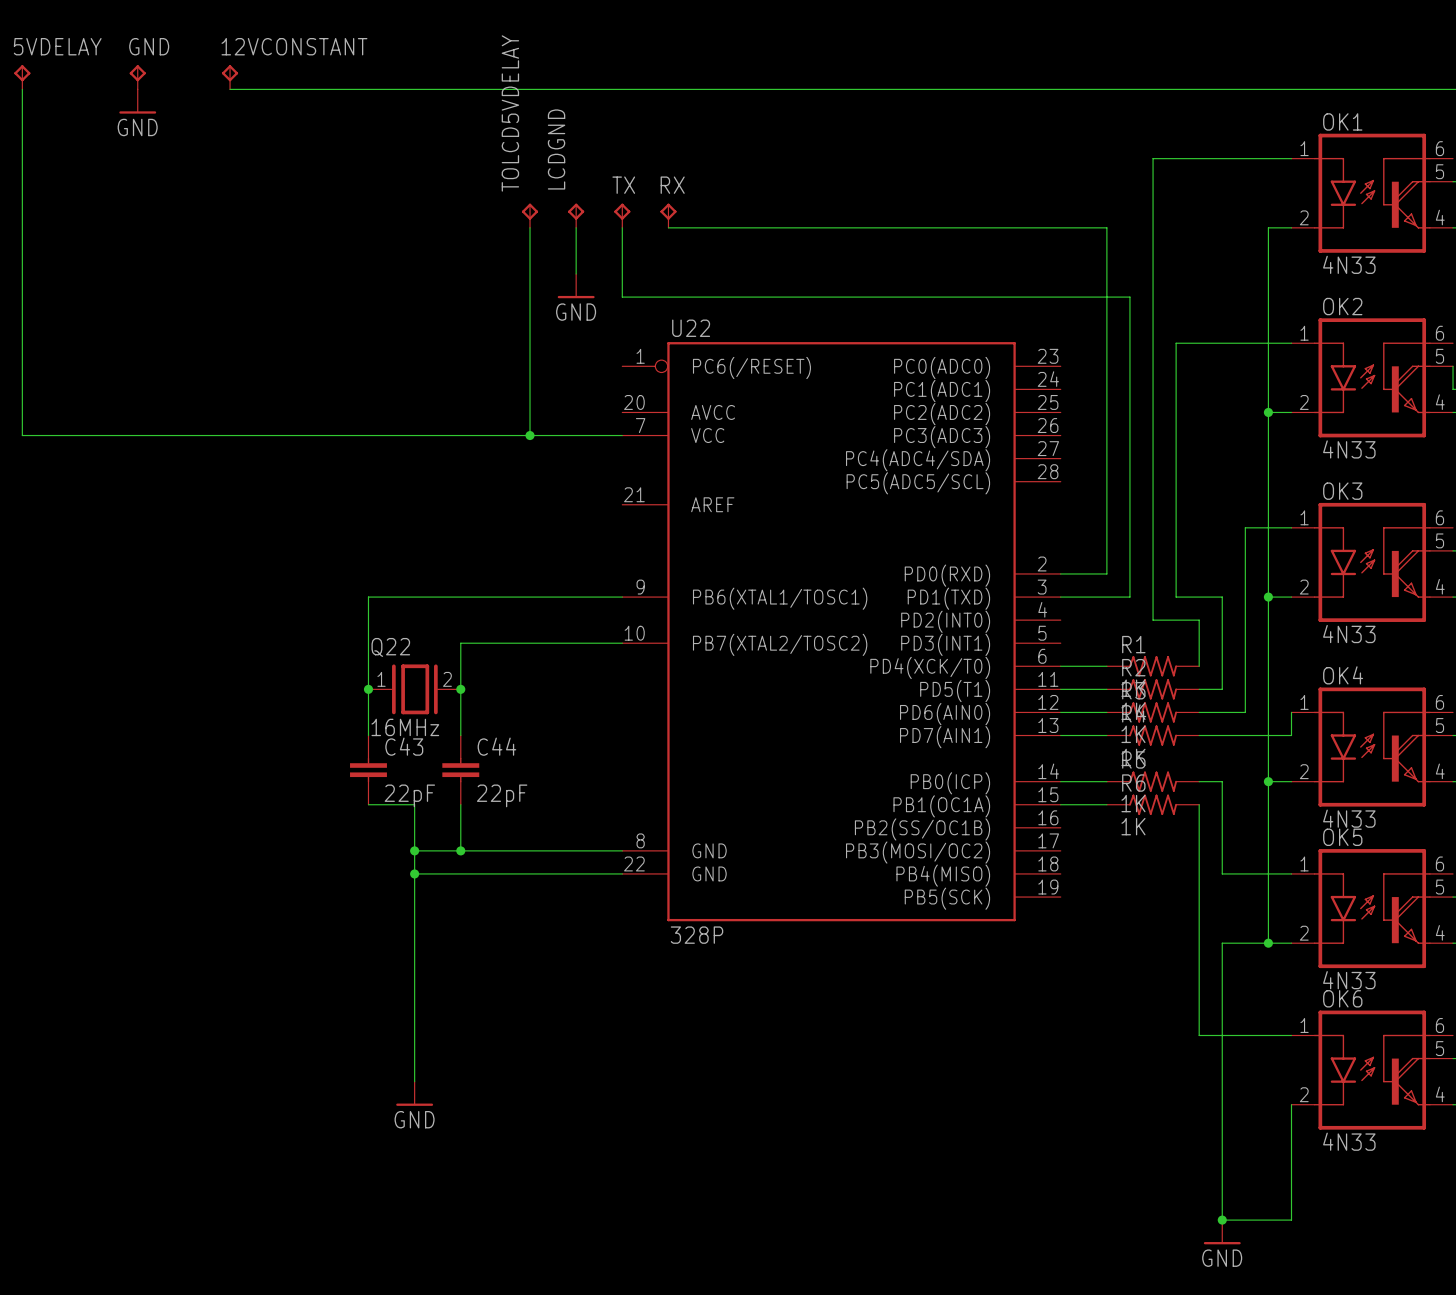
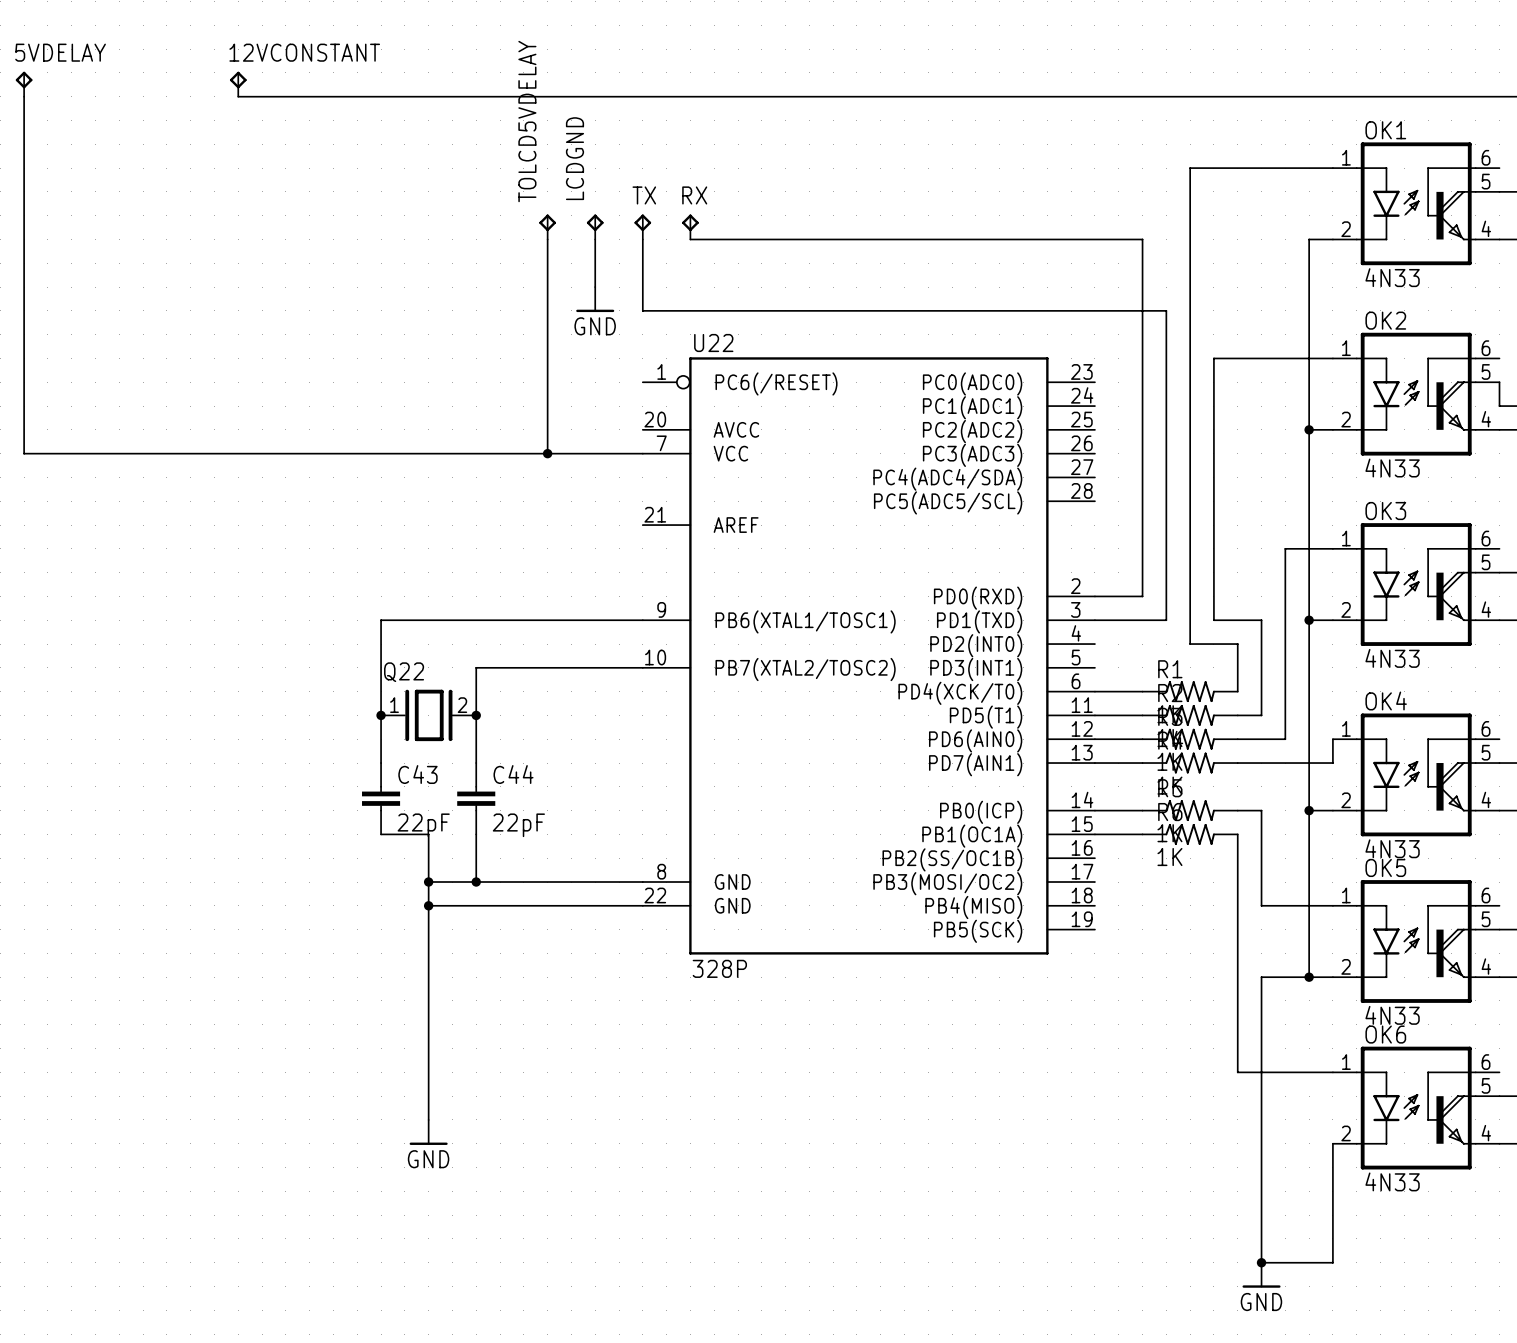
GND: (137, 77) -> none
power symbol: GND (137, 101) -> none
Q22 value: 16MHz (405, 727) -> none

